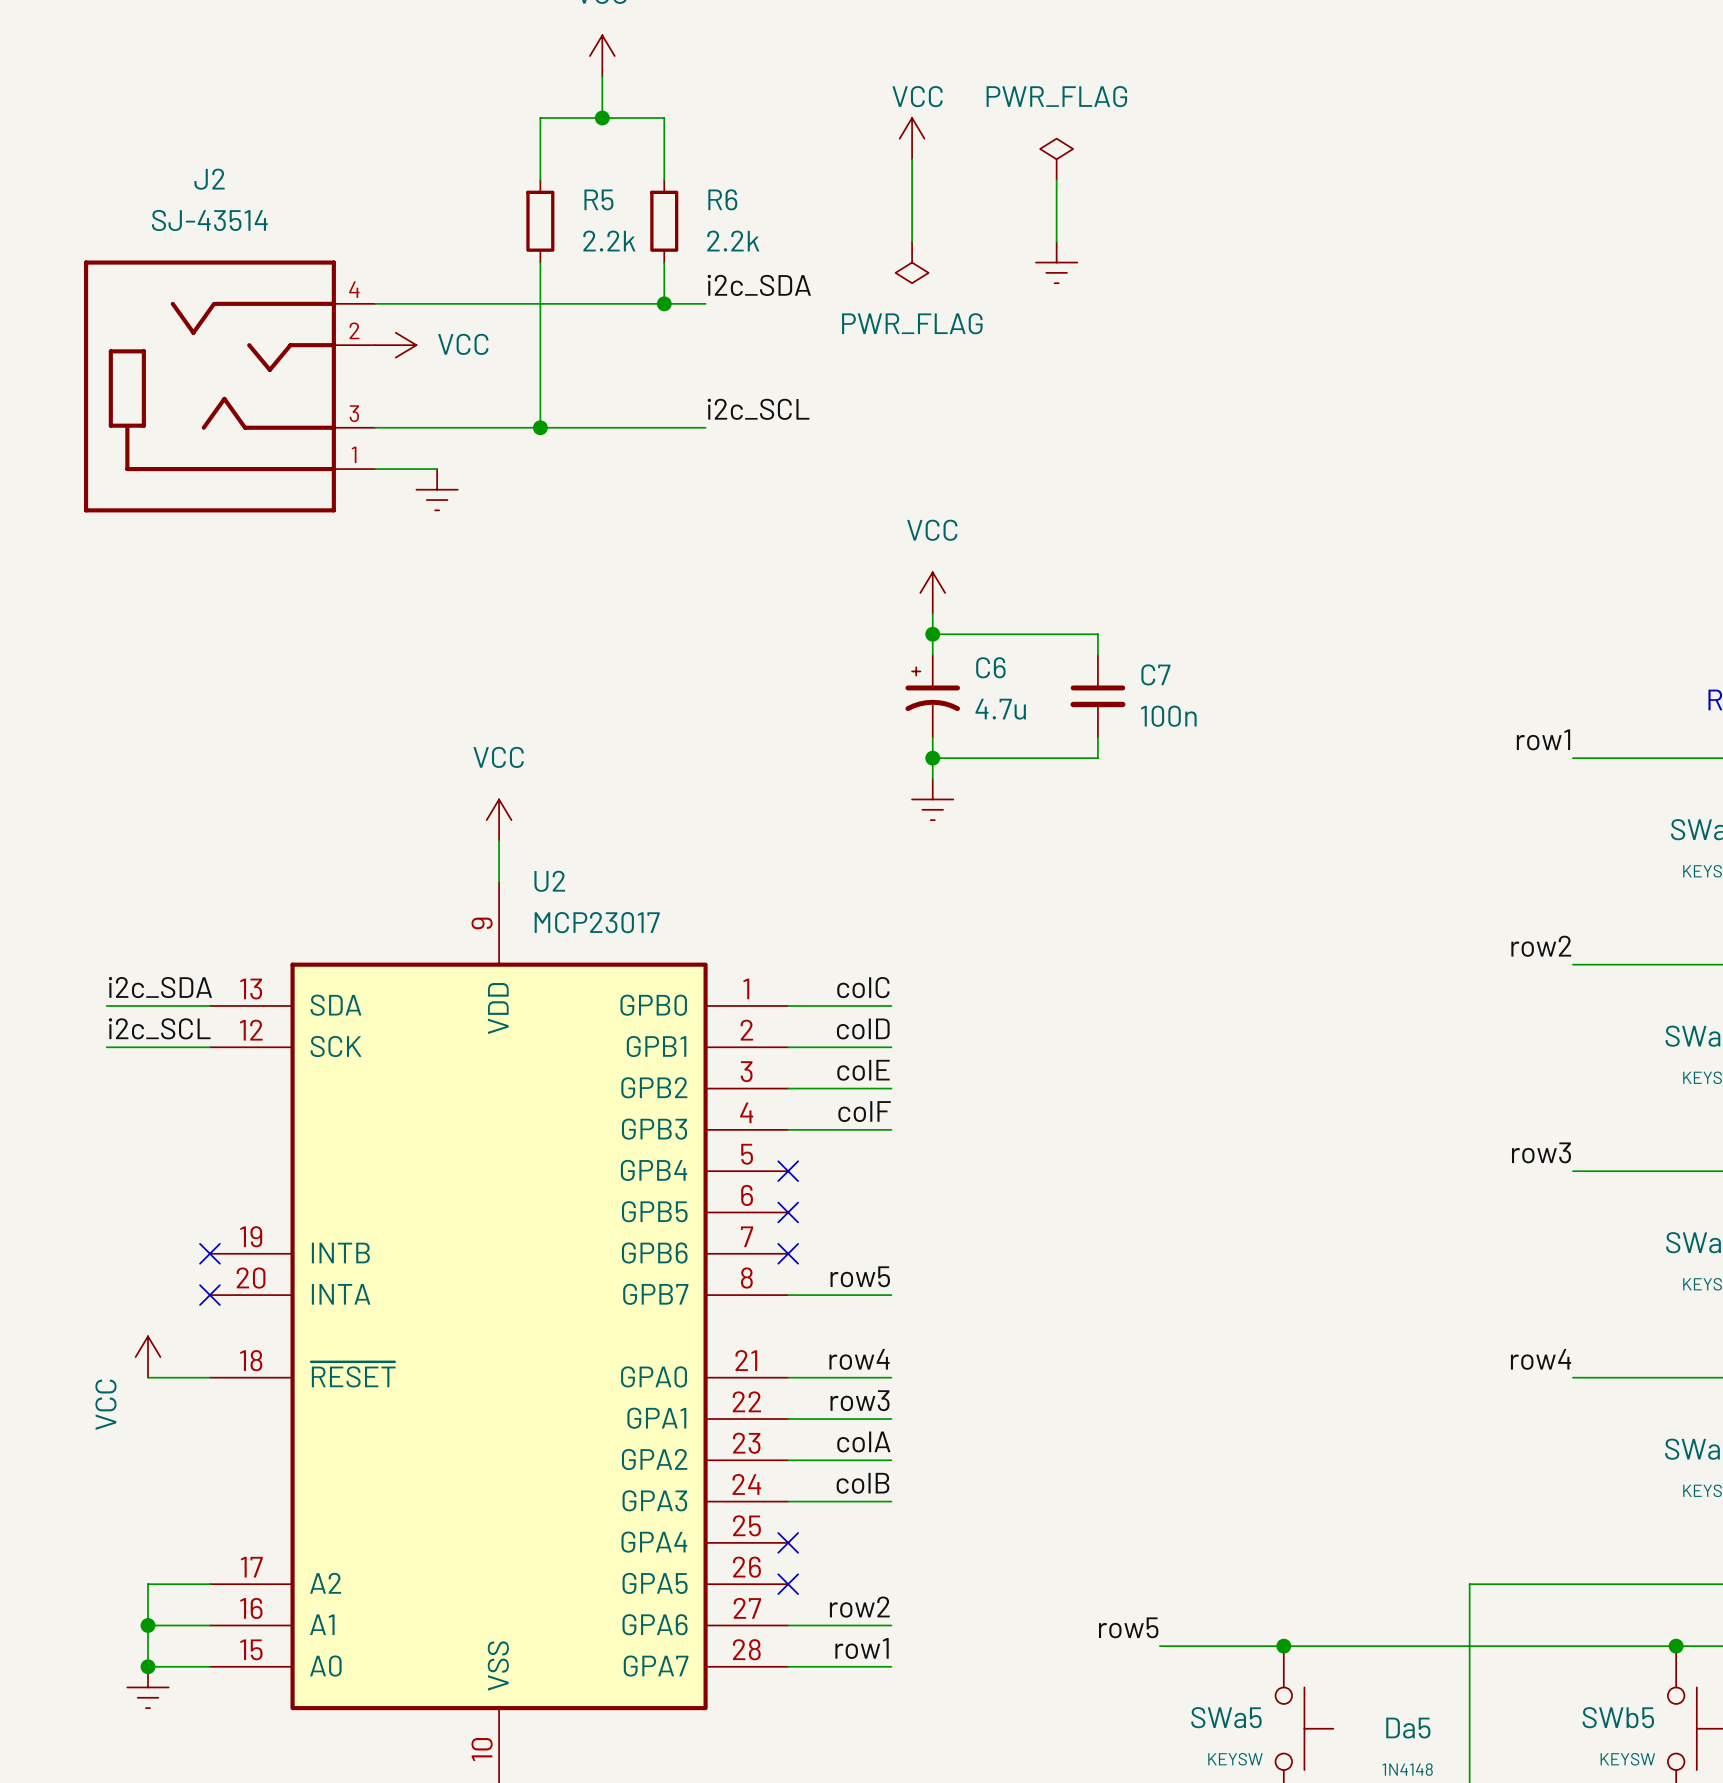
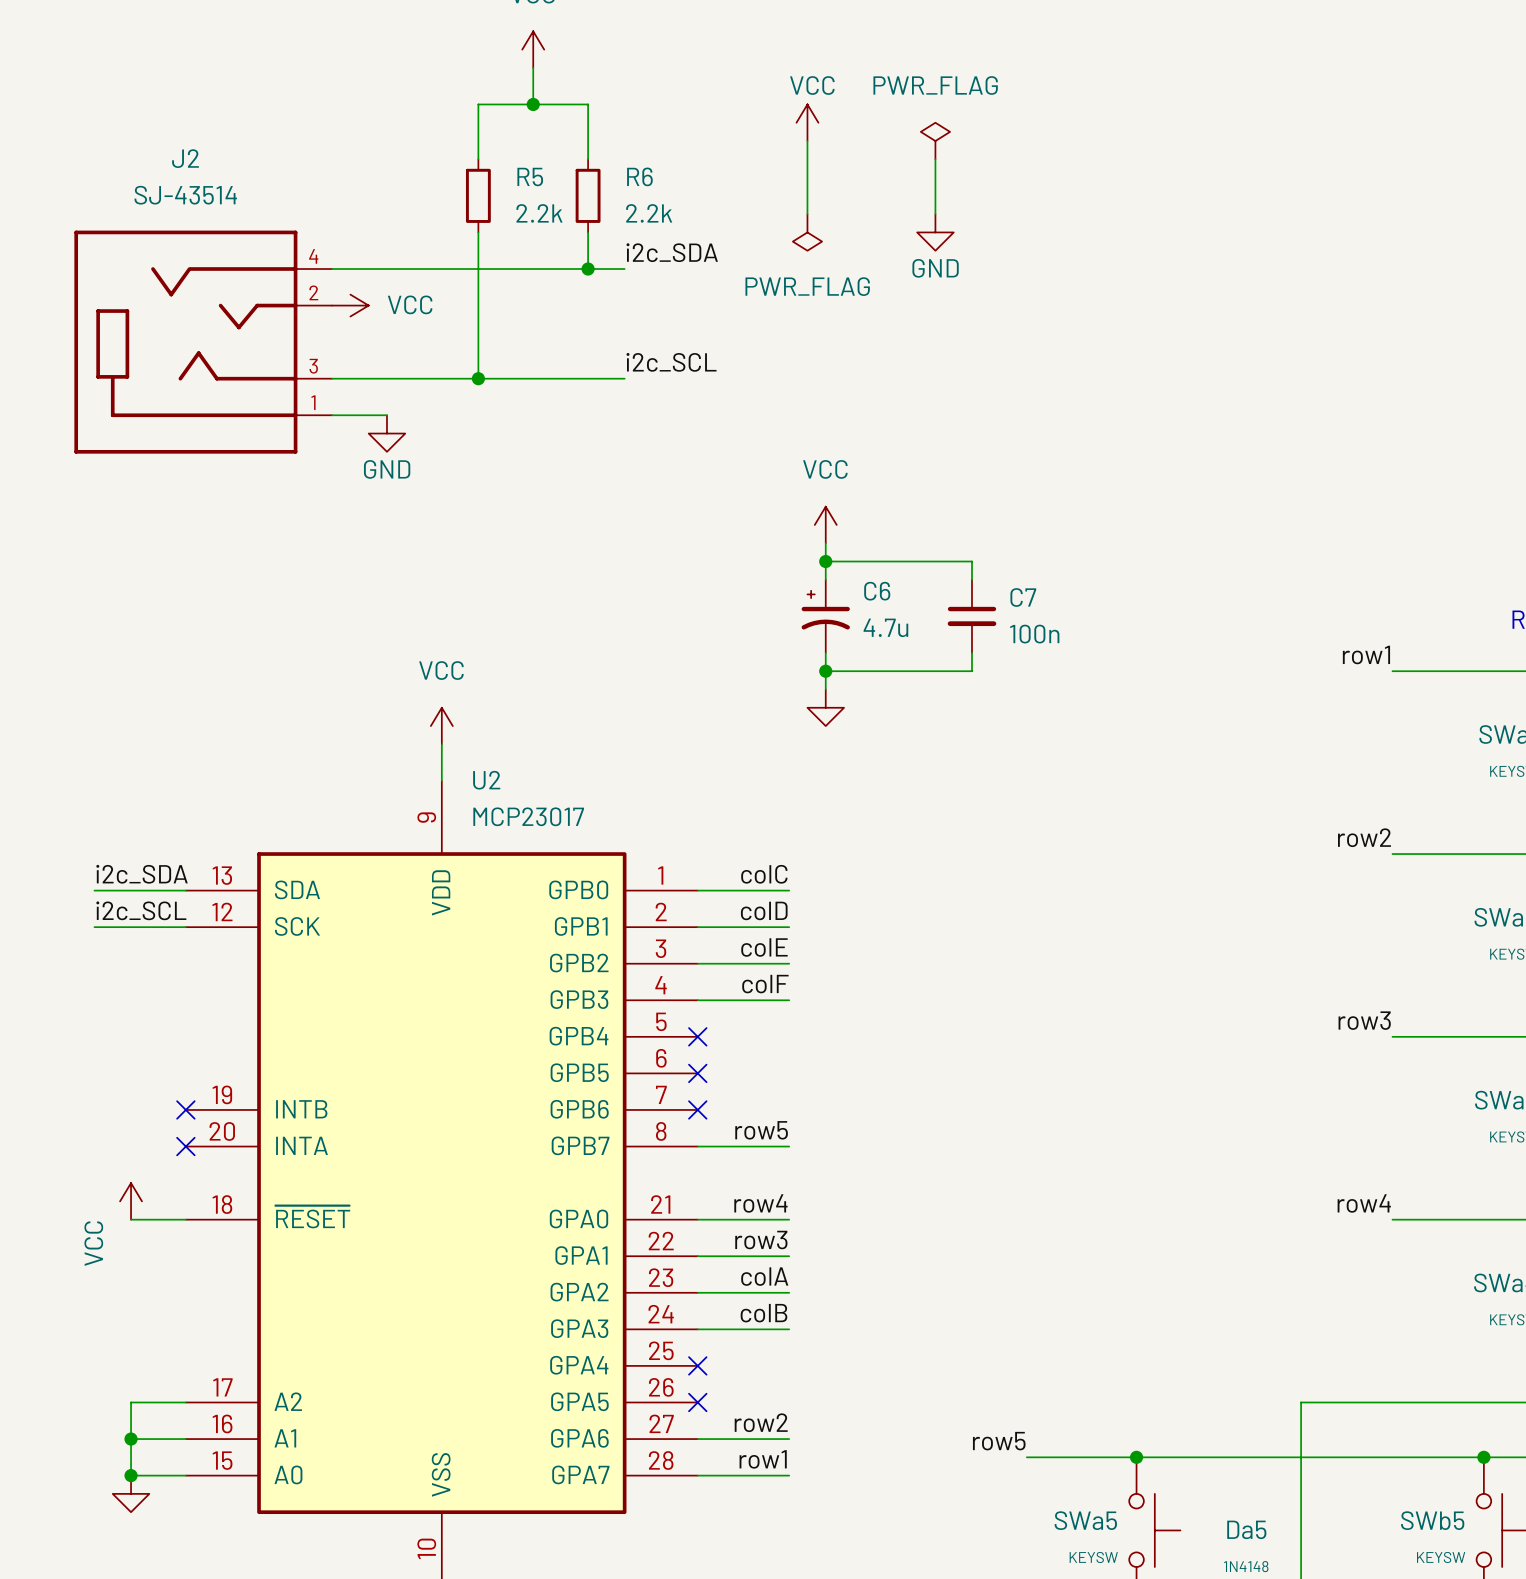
power symbol shape: [1035, 241, 1078, 284] -> [917, 214, 954, 251]
power symbol text: none -> GND (935, 268)
power symbol shape: [416, 469, 458, 511] -> [368, 415, 406, 452]
power symbol text: none -> GND (387, 469)
power symbol shape: [912, 778, 954, 821] -> [807, 689, 845, 727]
power symbol shape: [127, 1666, 169, 1709] -> [112, 1475, 150, 1513]

